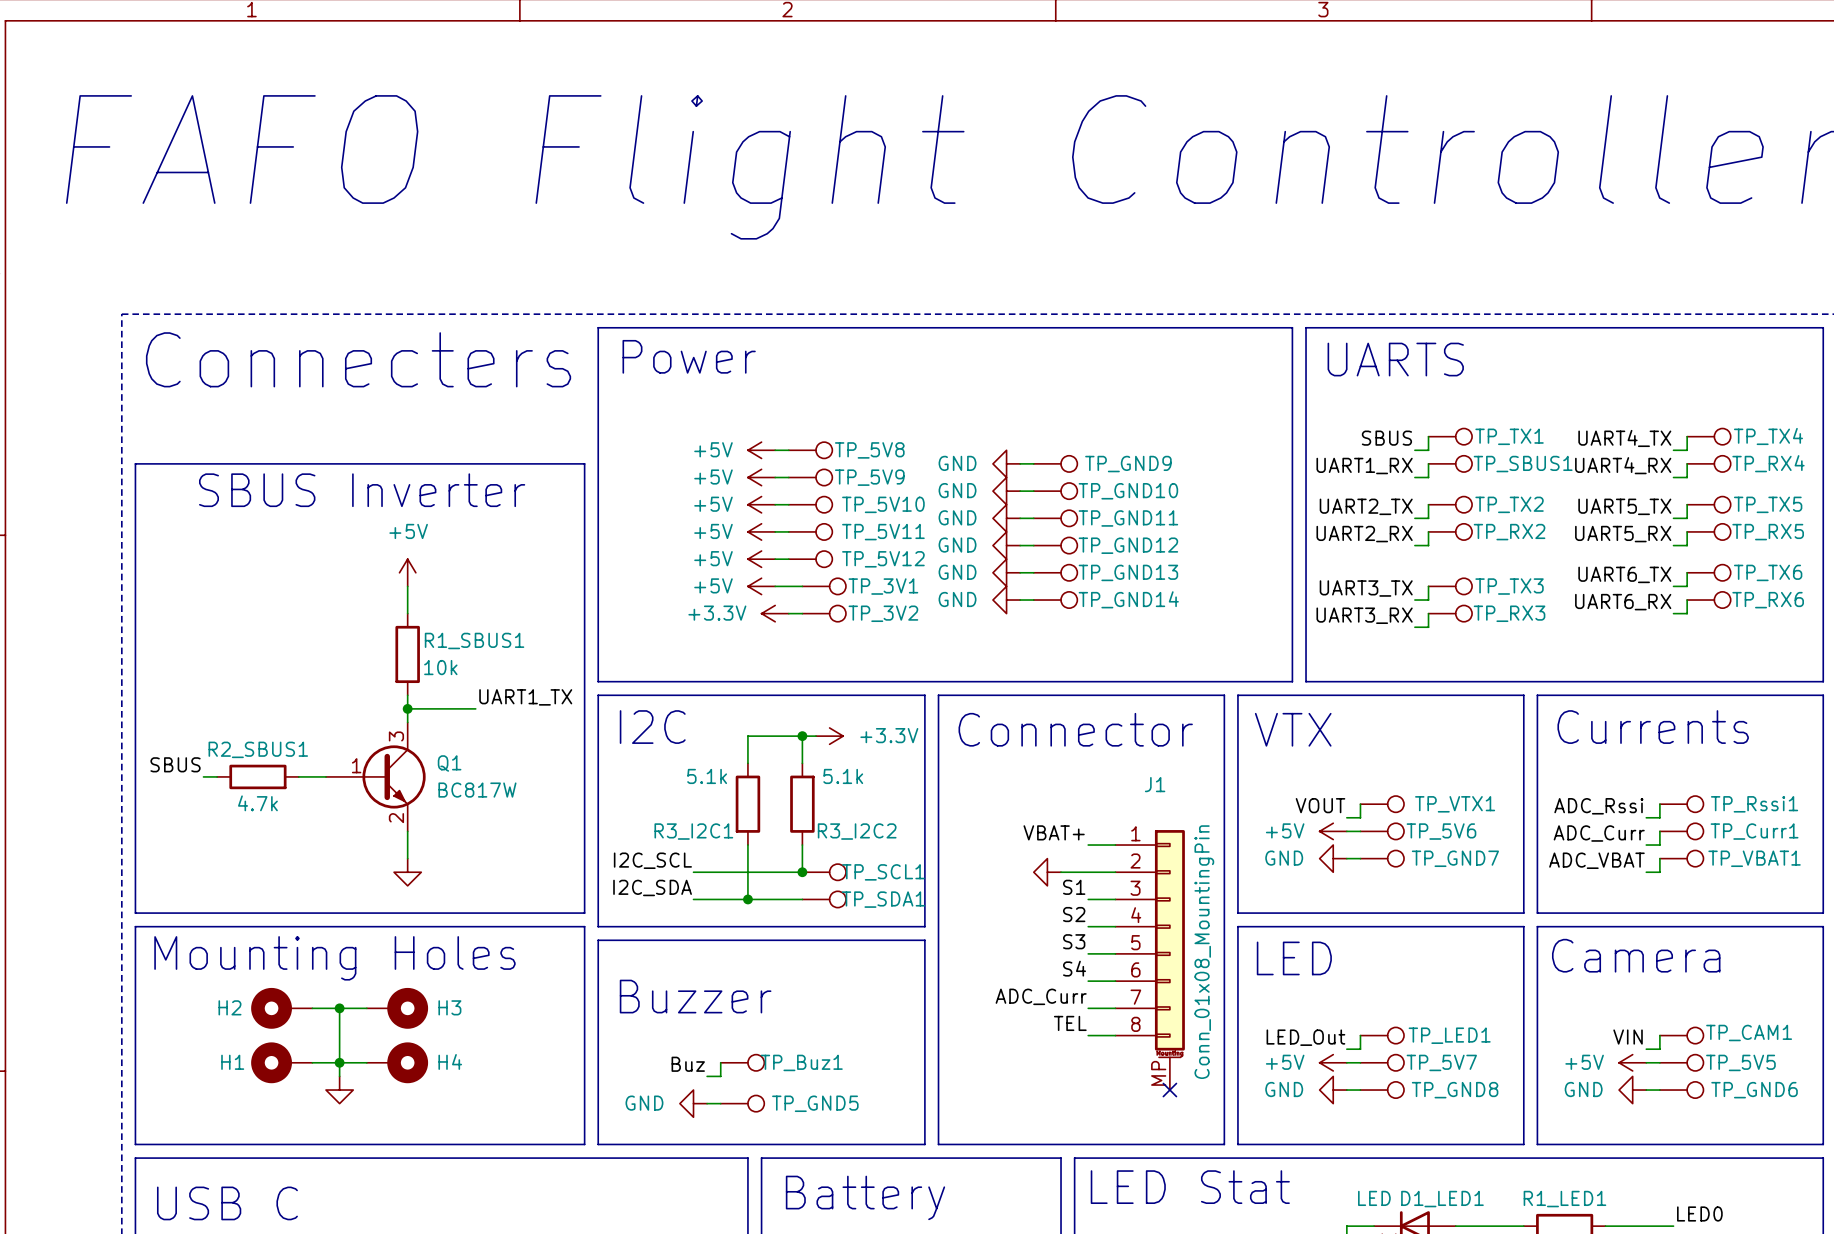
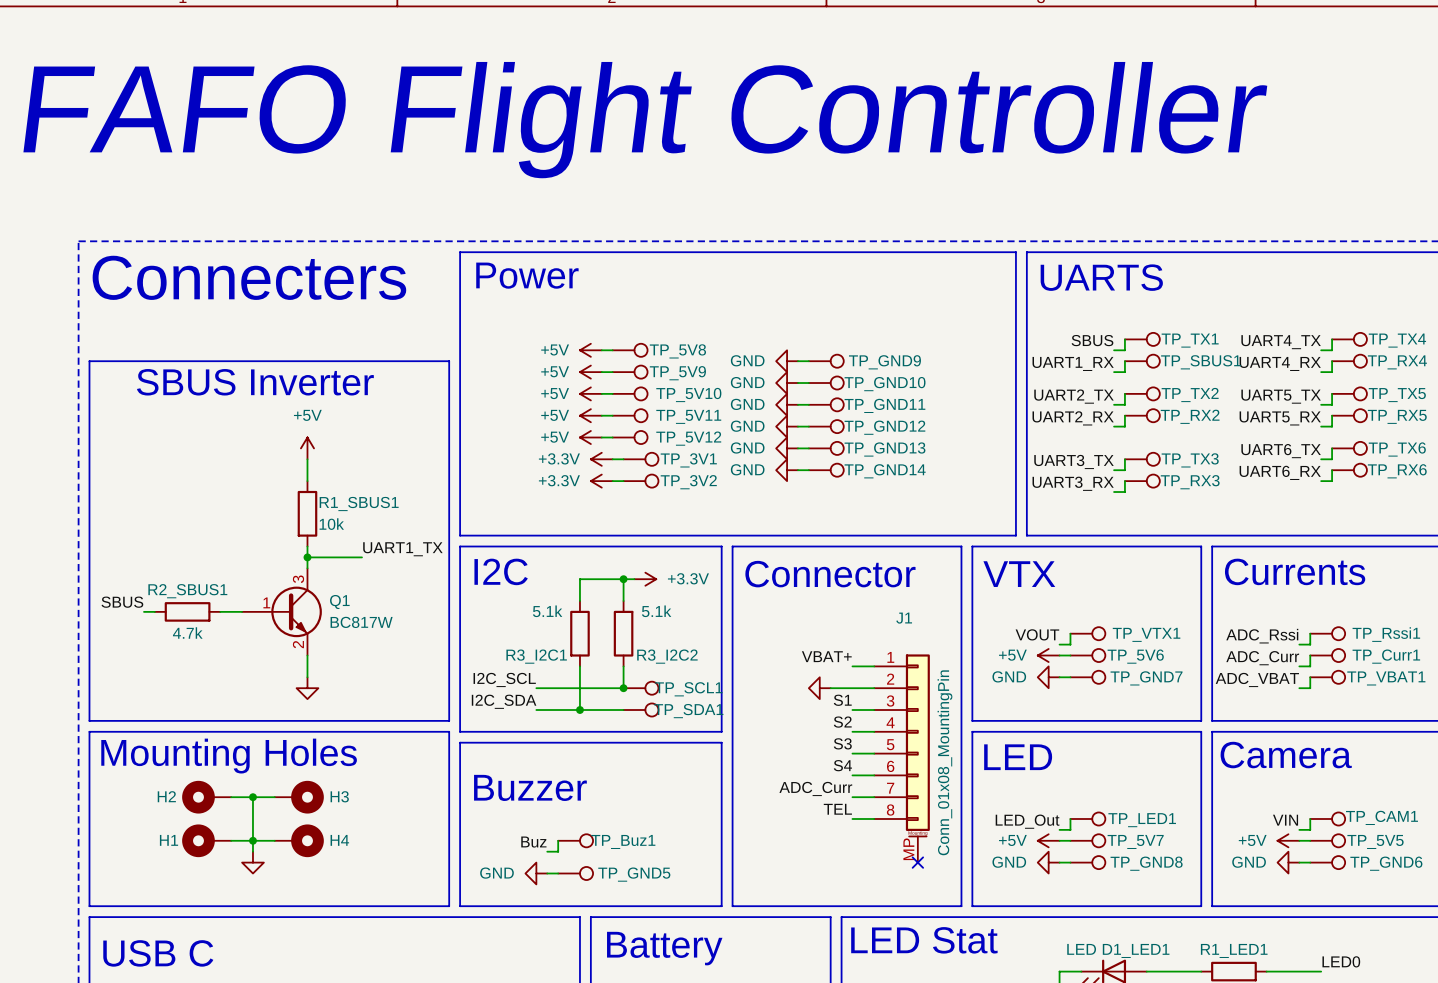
power symbol: +5V (761, 586) -> none
power symbol: none -> +3.3V (601, 459)

